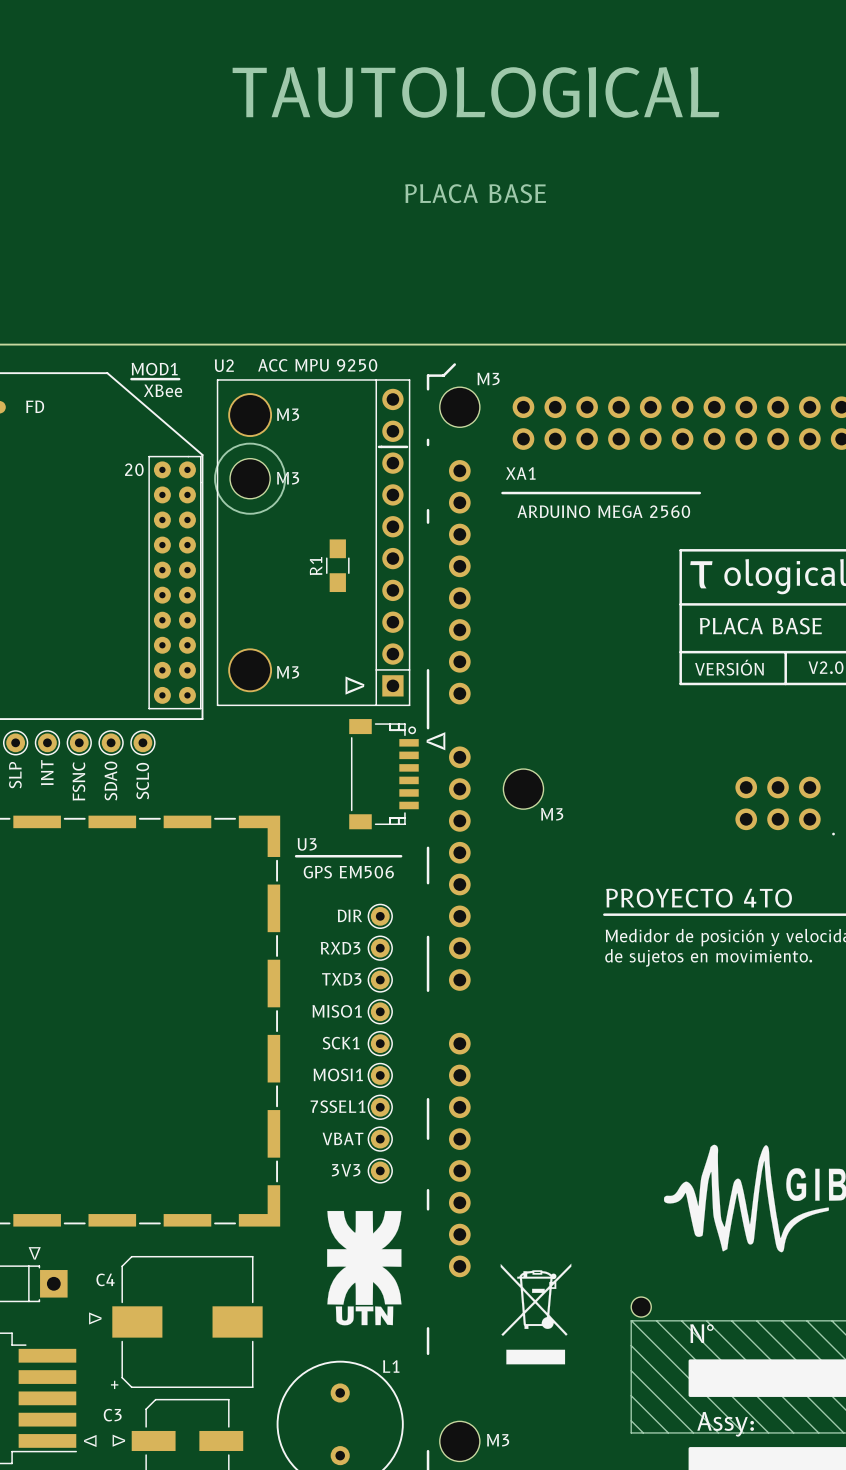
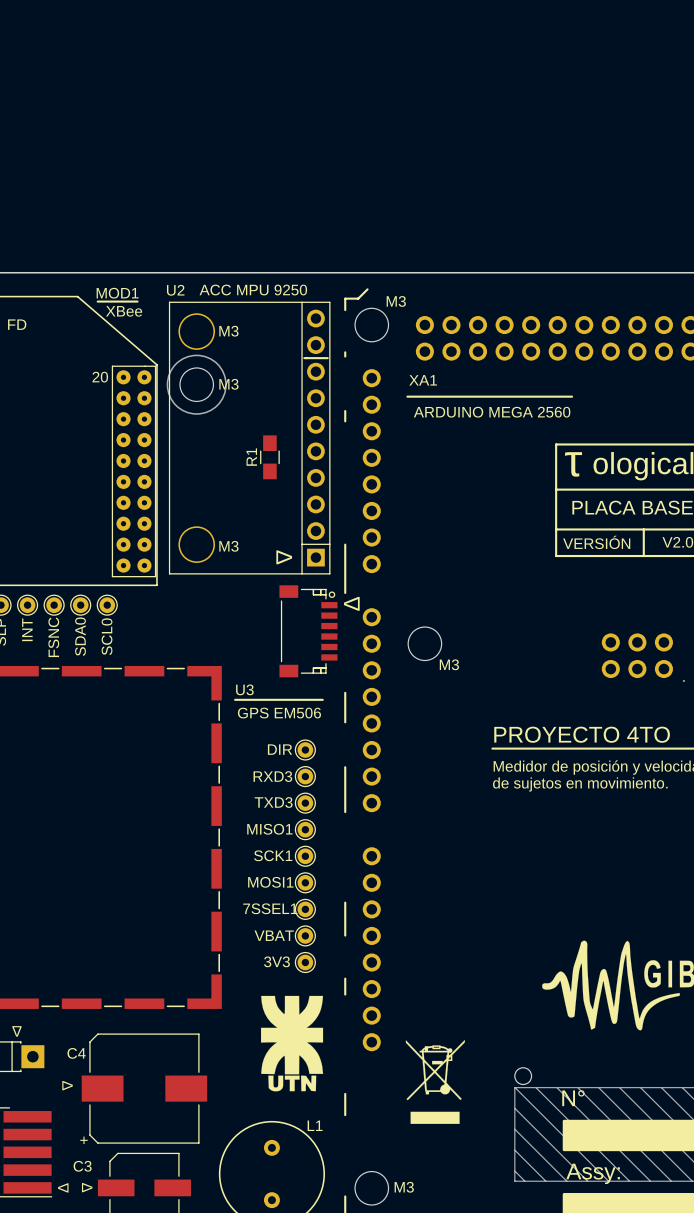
text: TAUTOLOGICAL (475, 92) -> none
text: PLACA BASE (475, 193) -> none

